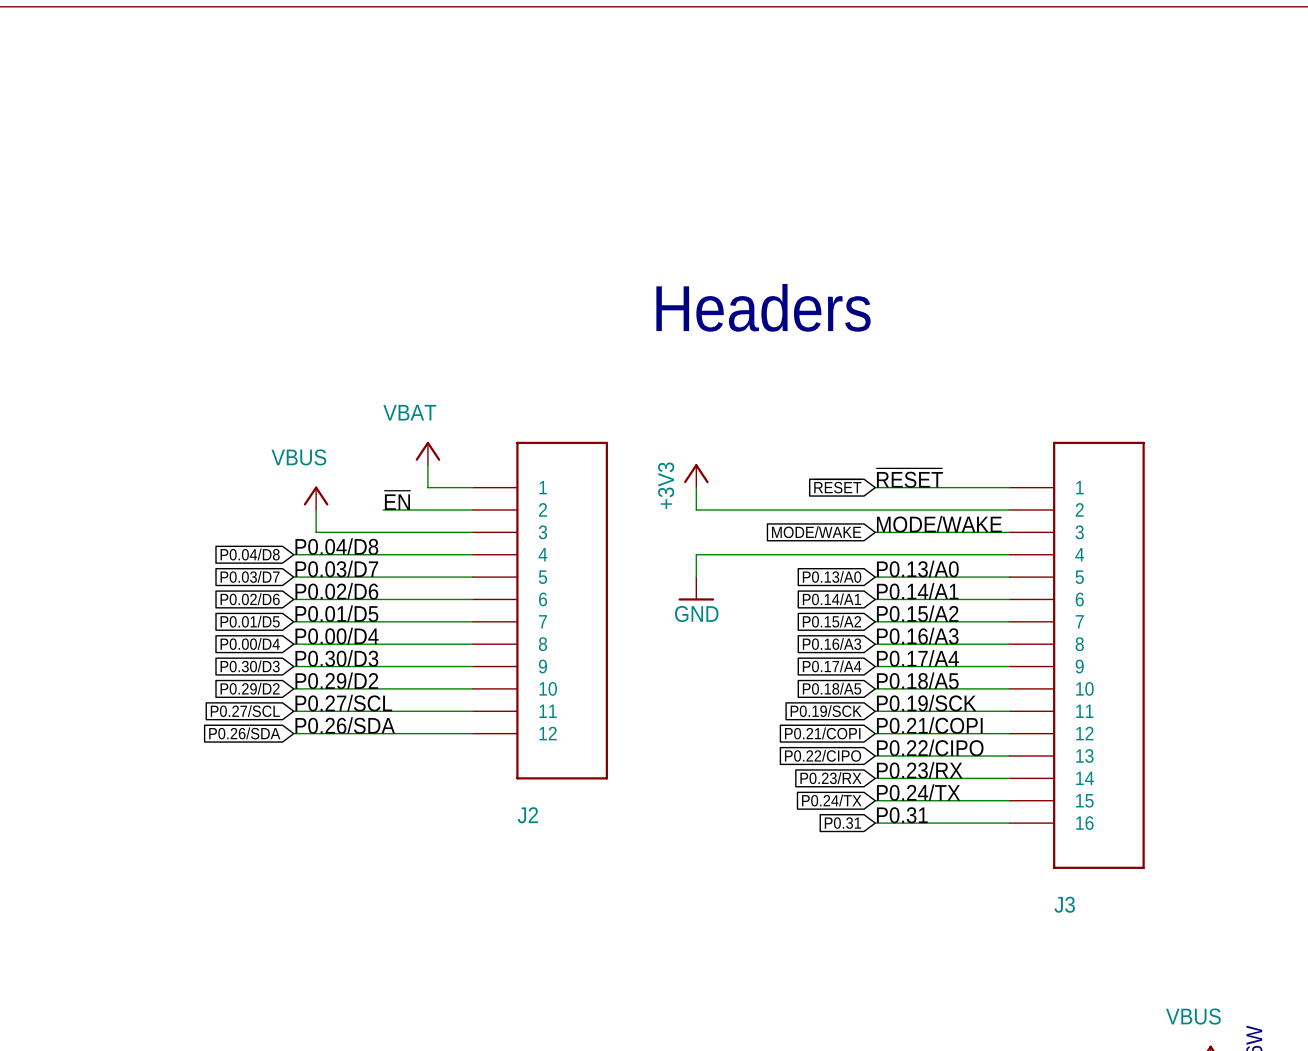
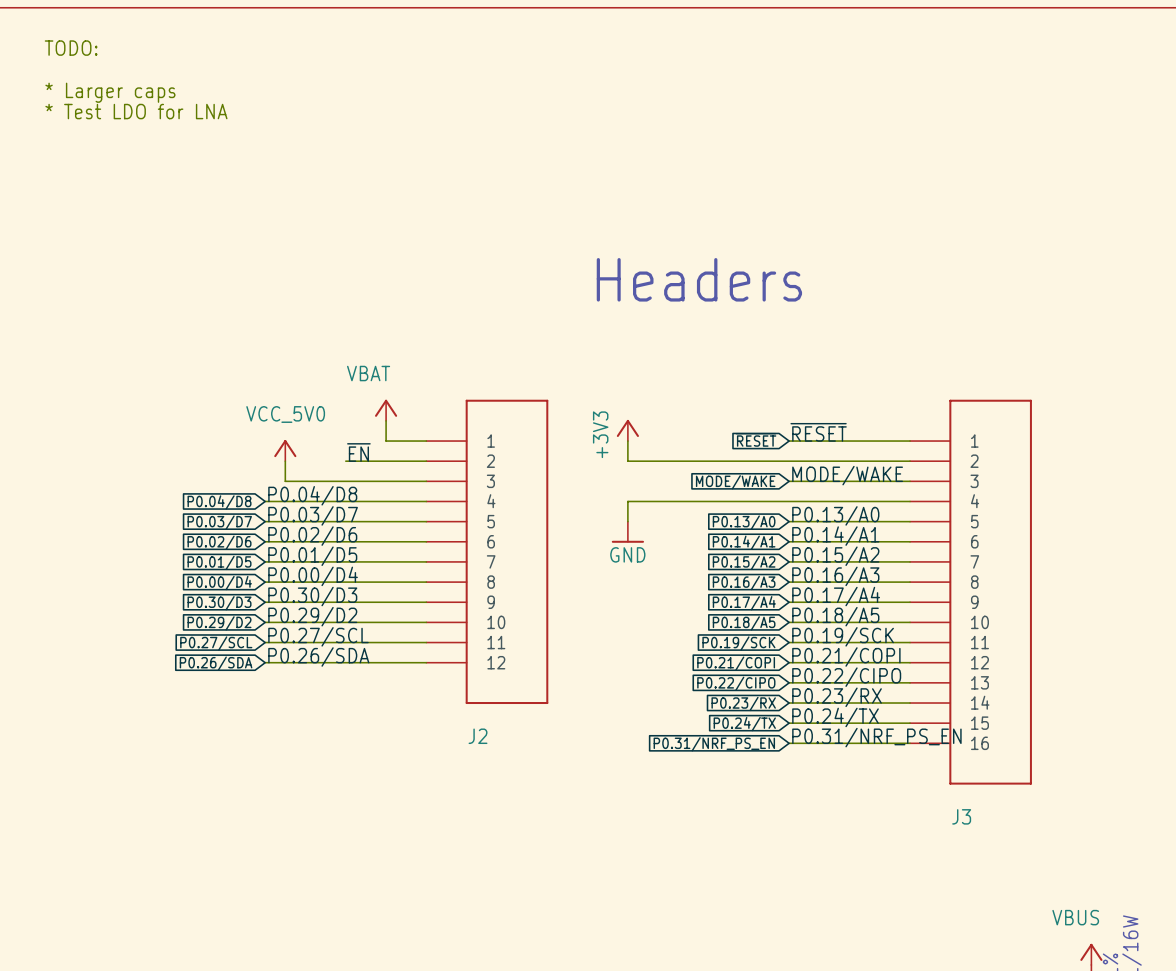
text: none -> TODO: (71, 48)
text: none -> * Larger caps (110, 92)
text: none -> * Test LDO for LNA (136, 111)
power symbol: VBUS (316, 498) -> VCC_5V0 (285, 450)
label: P0.31 (902, 815) -> P0.31/NRF_PS_EN (876, 737)
global label: P0.31 (842, 823) -> P0.31/NRF_PS_EN (714, 744)

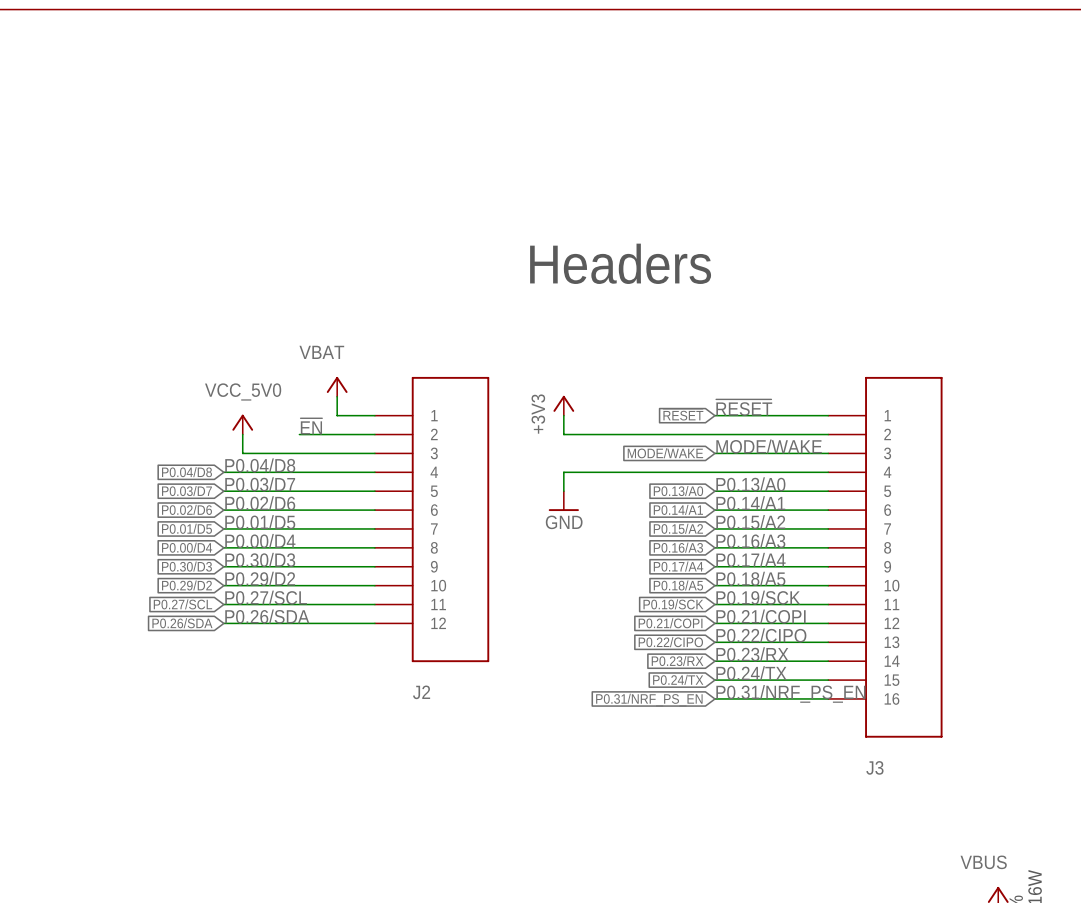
text: TODO: (71, 48) -> none
text: * Larger caps (110, 92) -> none
text: * Test LDO for LNA (136, 111) -> none

